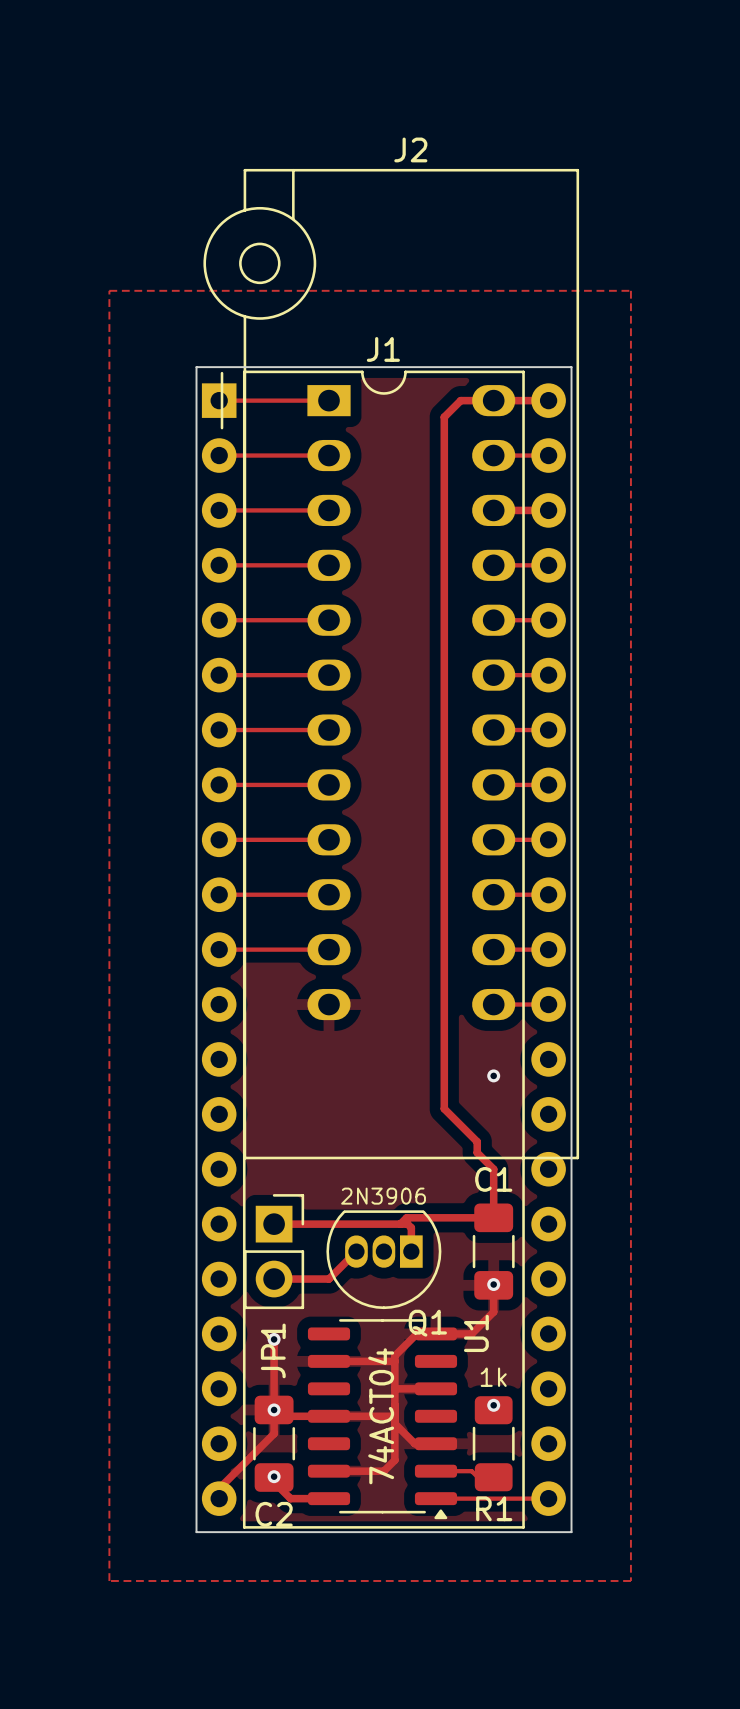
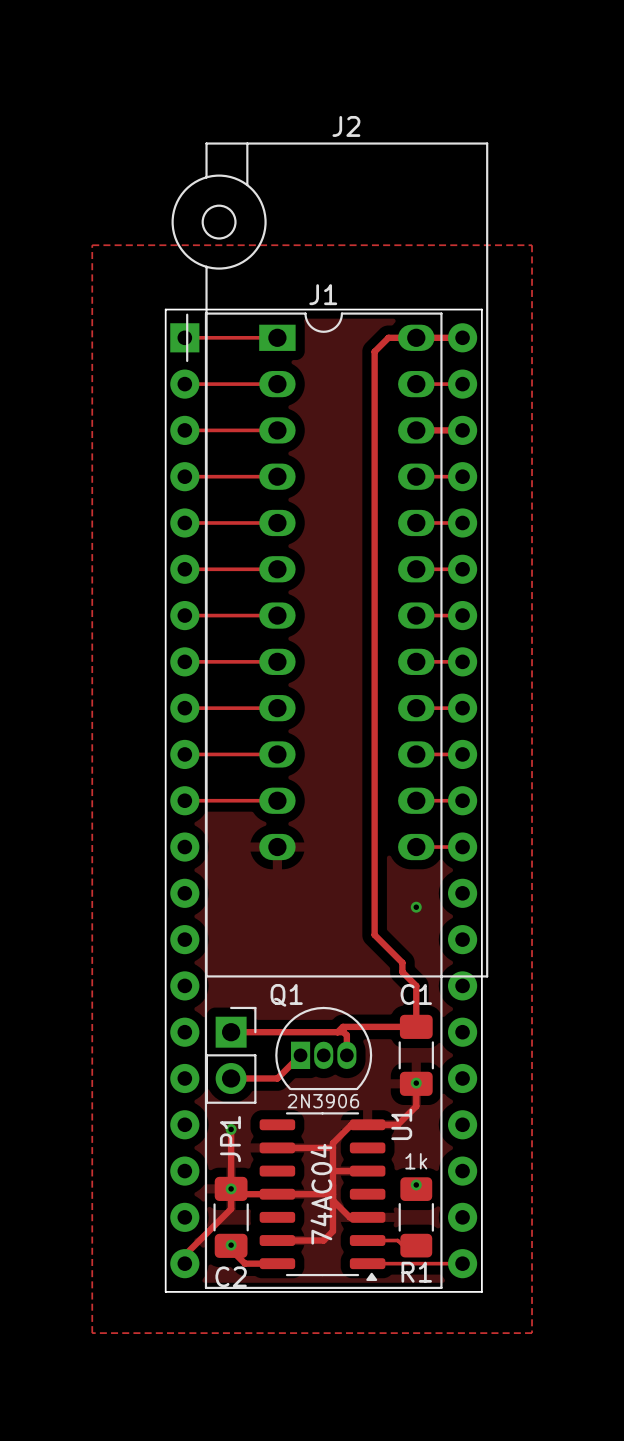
Q1 rotation: 0° (383, 1259) -> 180° (323, 1048)
U1 value: 74ACT04 (381, 1416) -> 74AC04 (321, 1194)

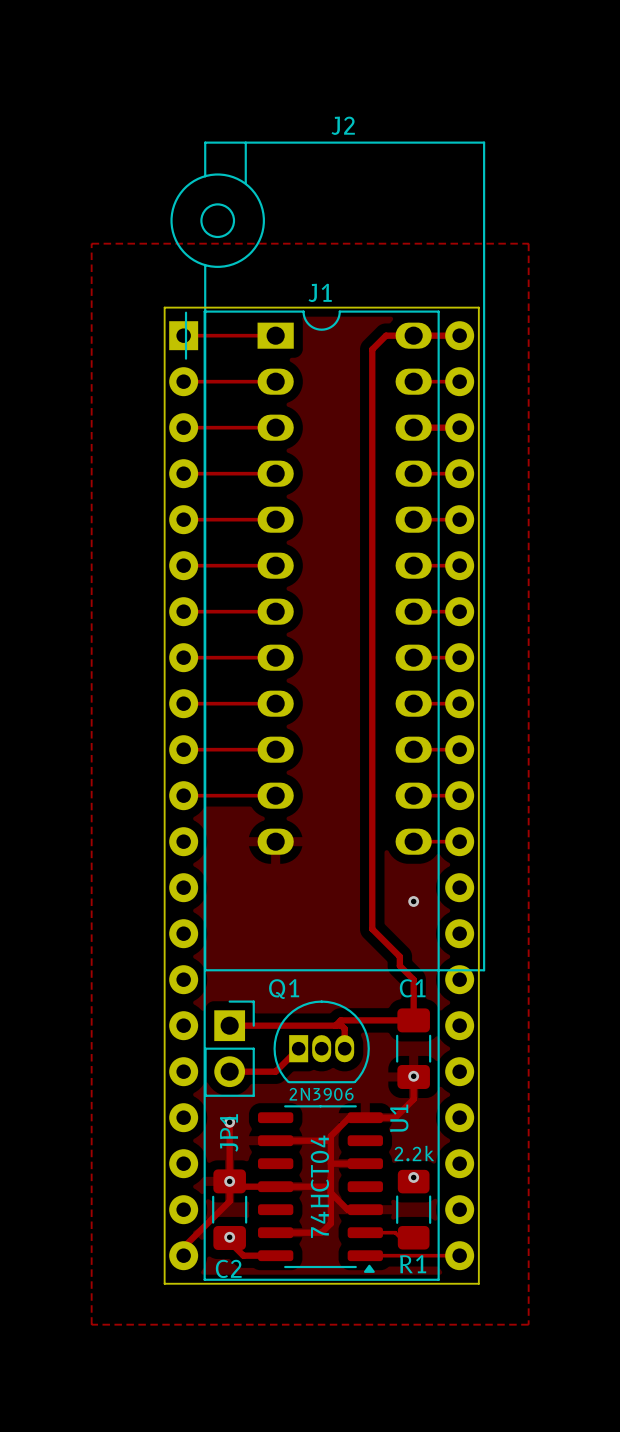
R1 value: 1k (416, 1161) -> 2.2k (414, 1153)
U1 value: 74AC04 (321, 1194) -> 74HCT04 (319, 1186)

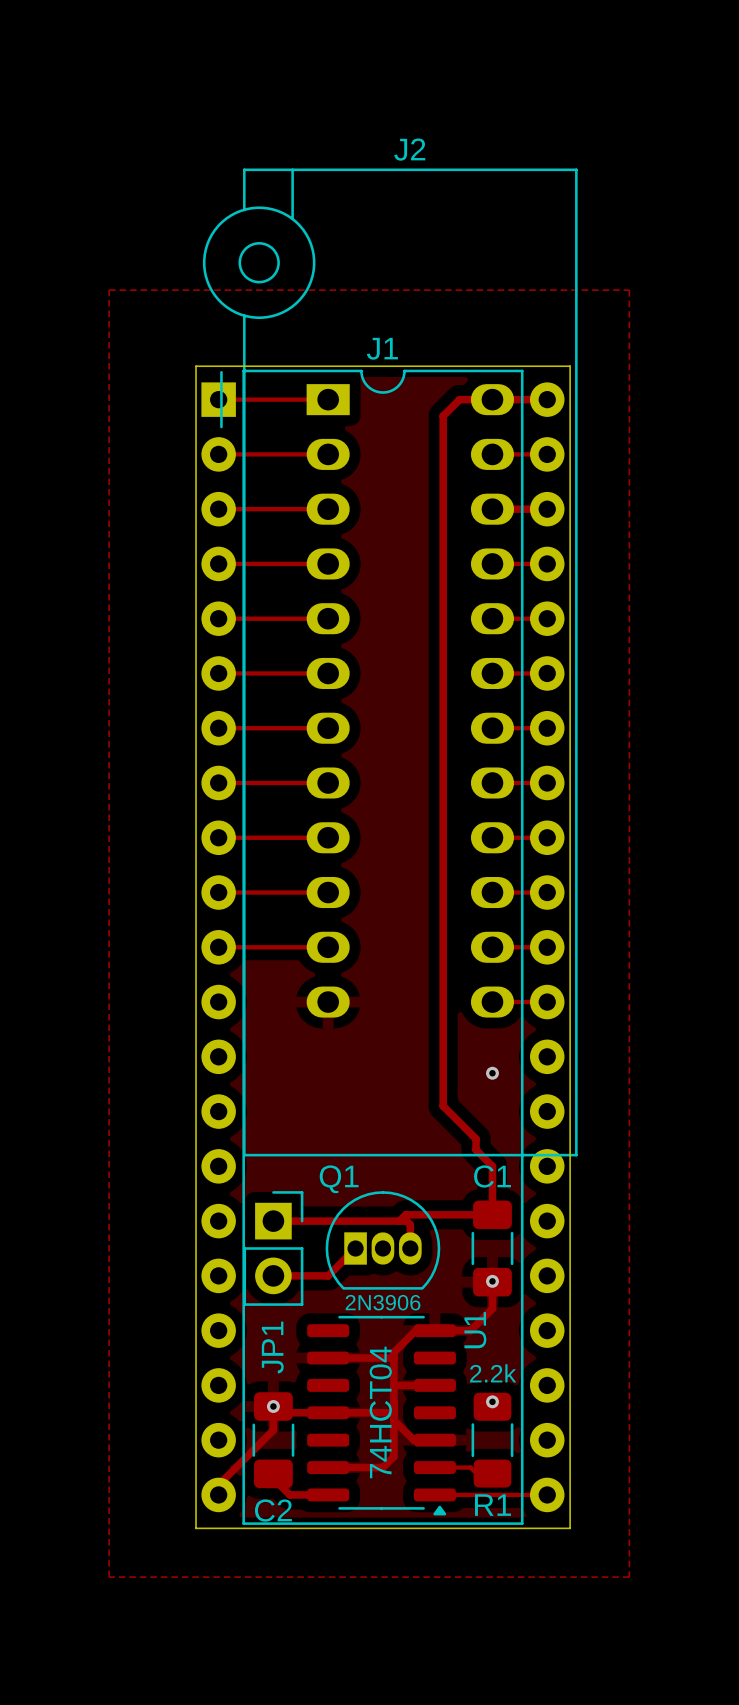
track: (229, 1122) (229, 1181) -> none
via: (229, 1122) -> none
via: (229, 1237) -> none

